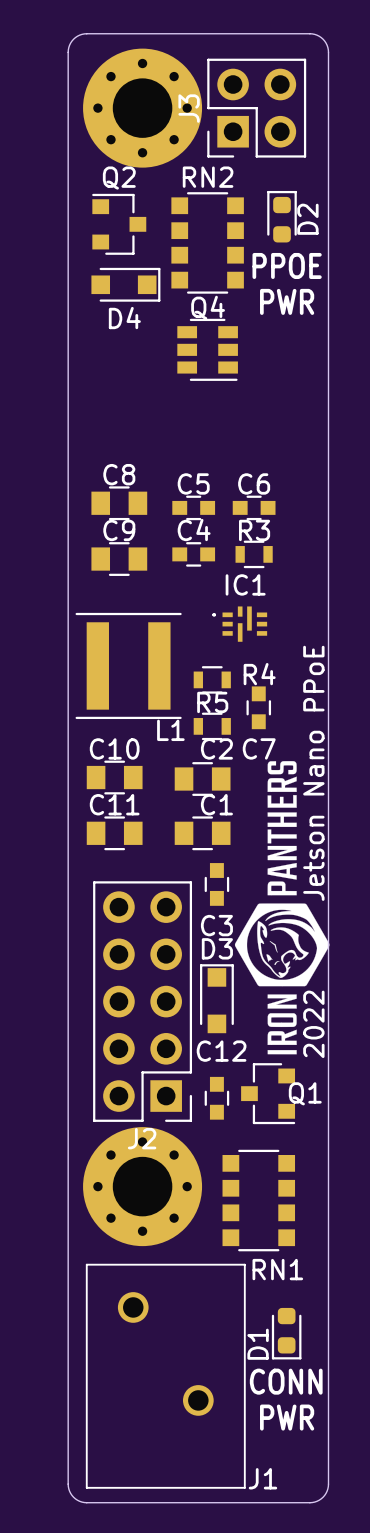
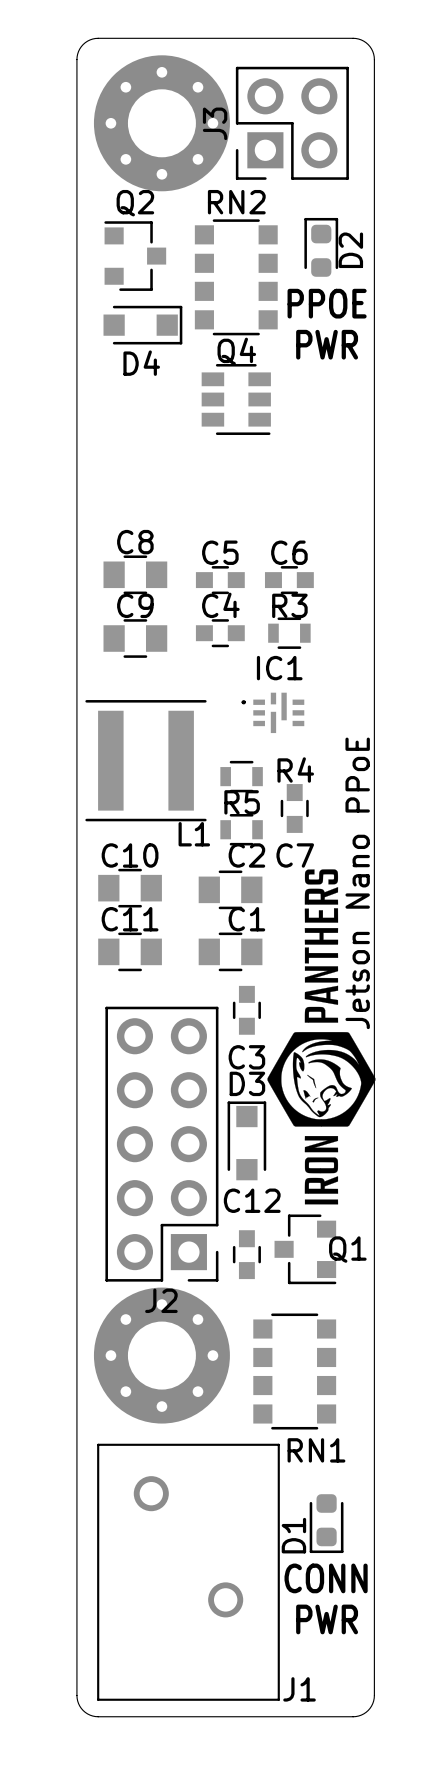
text: 2022 (313, 1024) -> none

